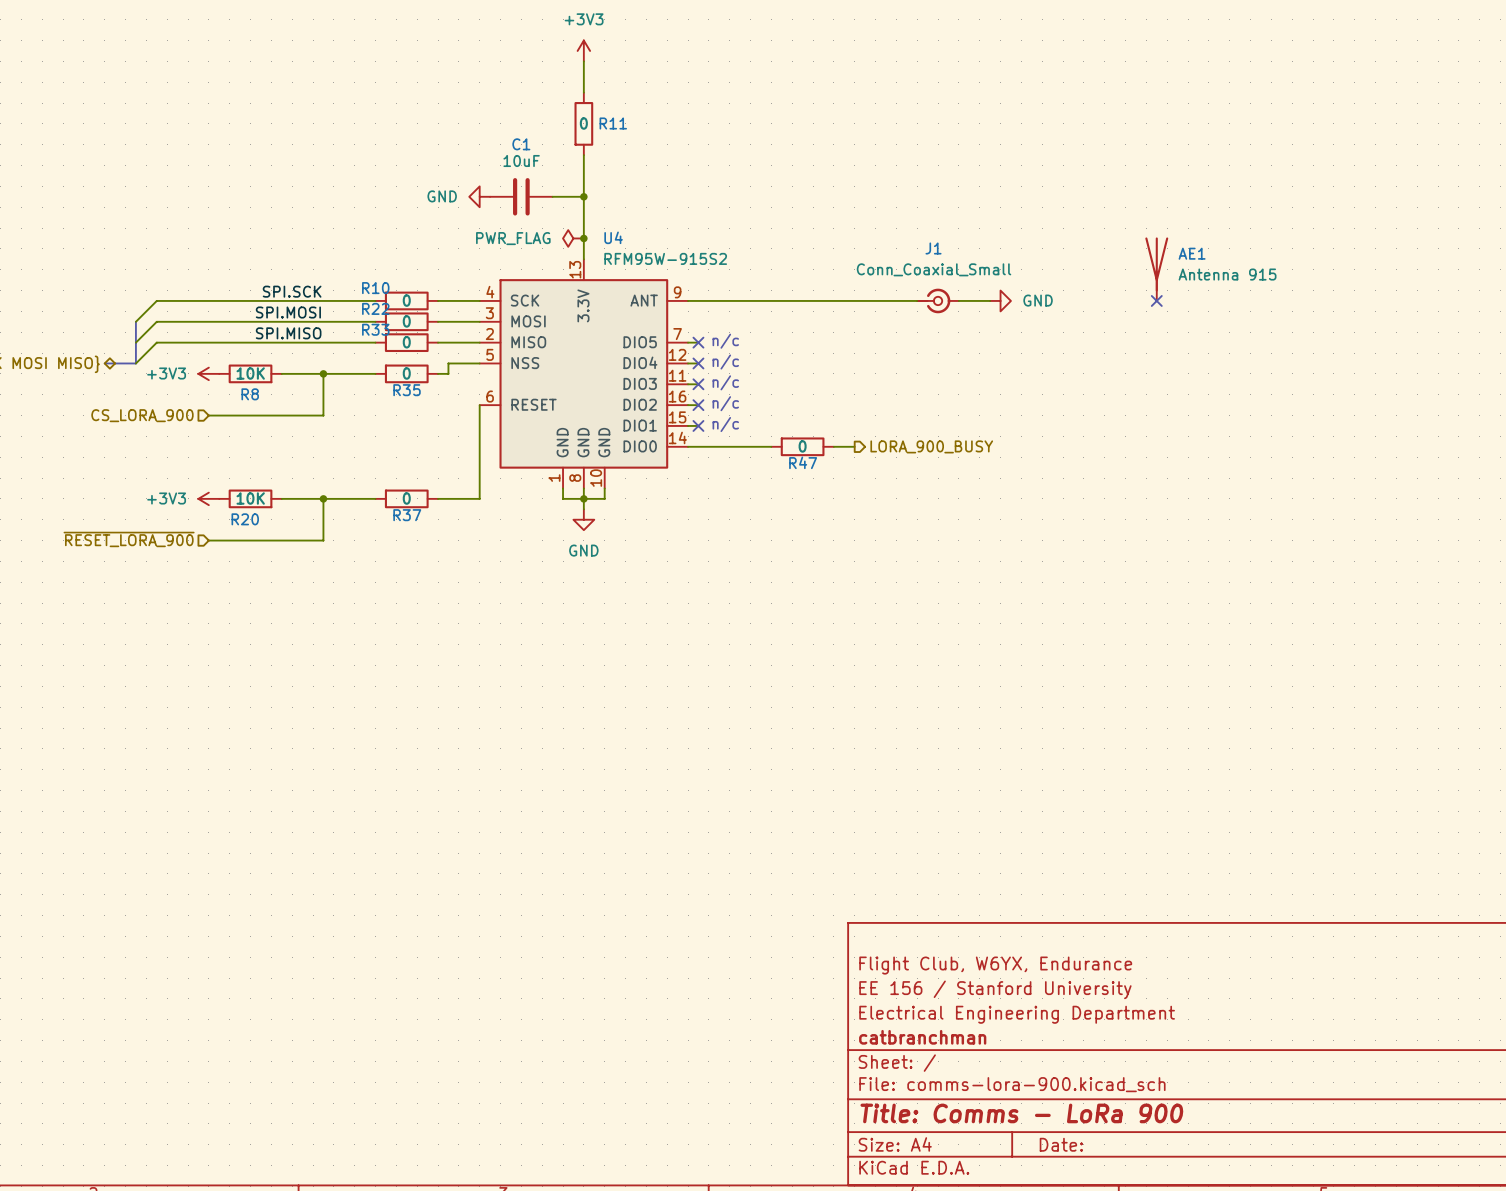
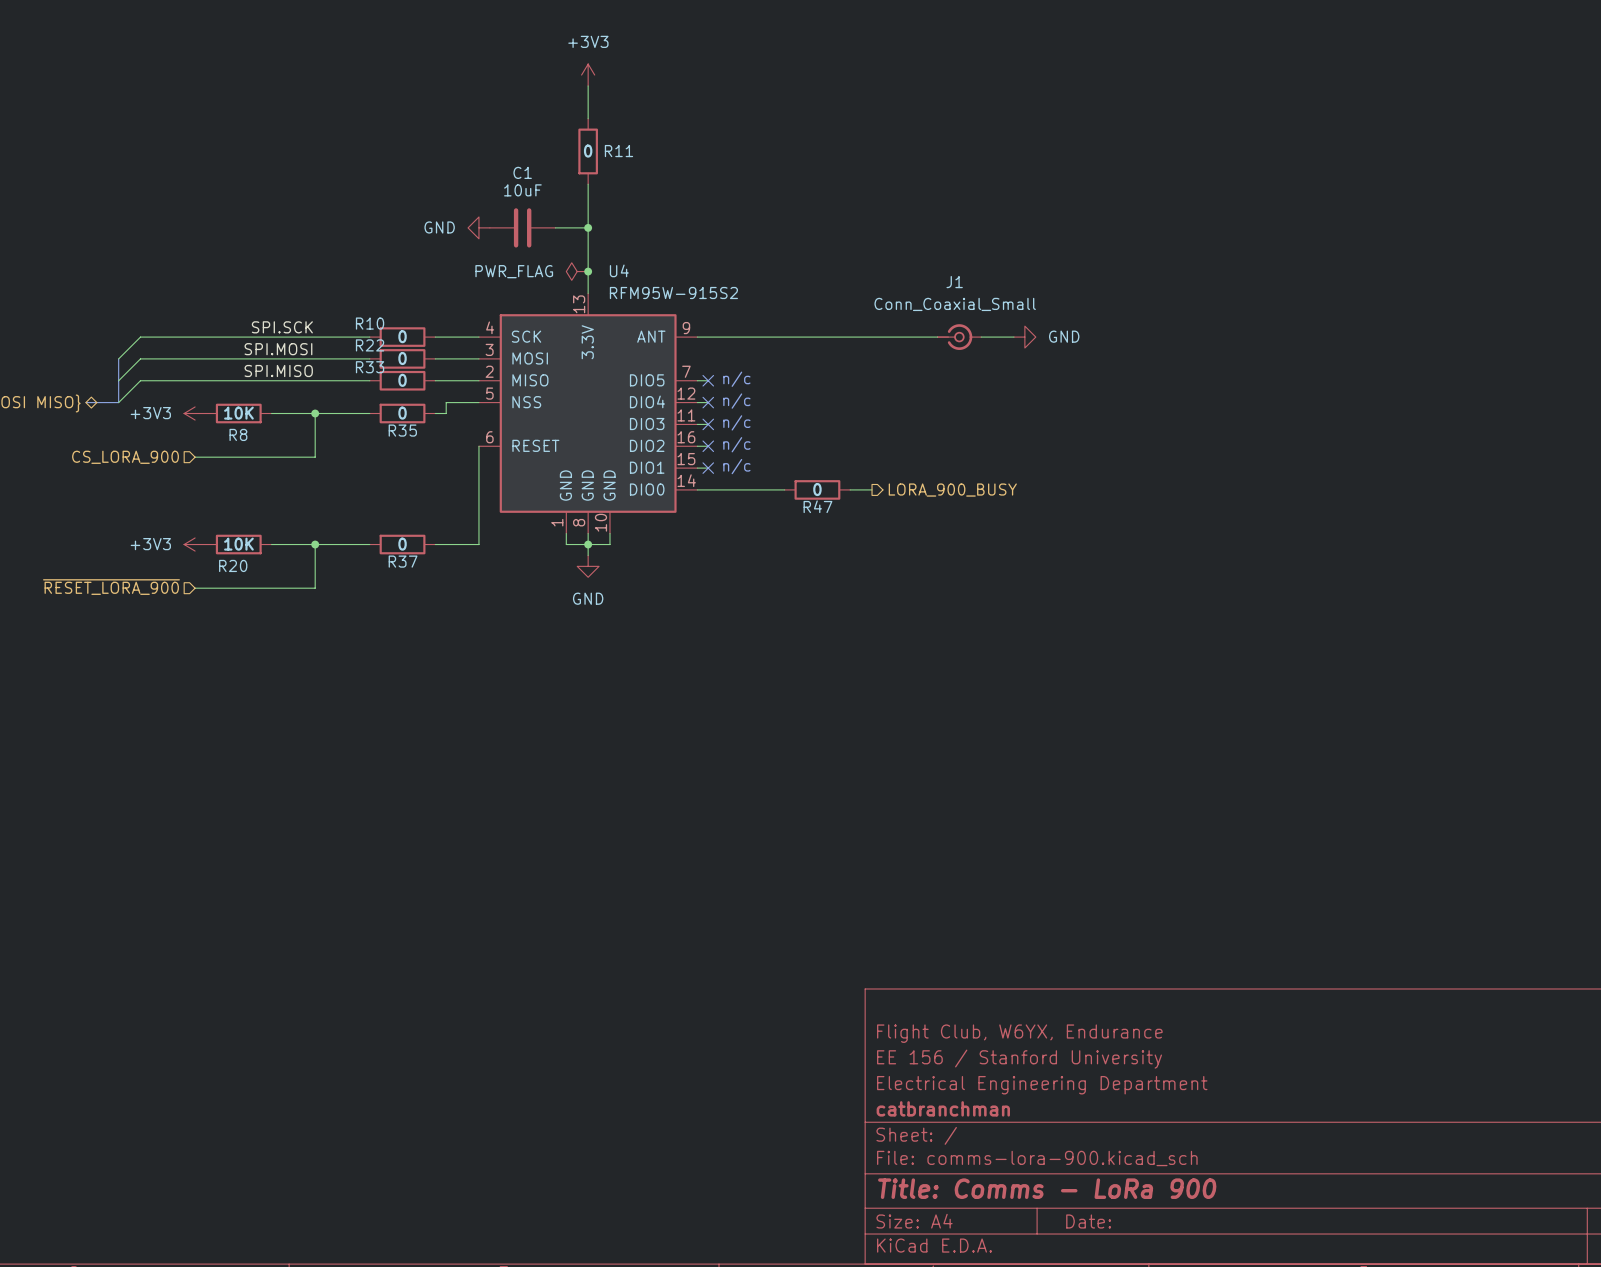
AE1: Antenna 915 (1156, 269) -> none
no-connect mark: (1156, 300) -> none

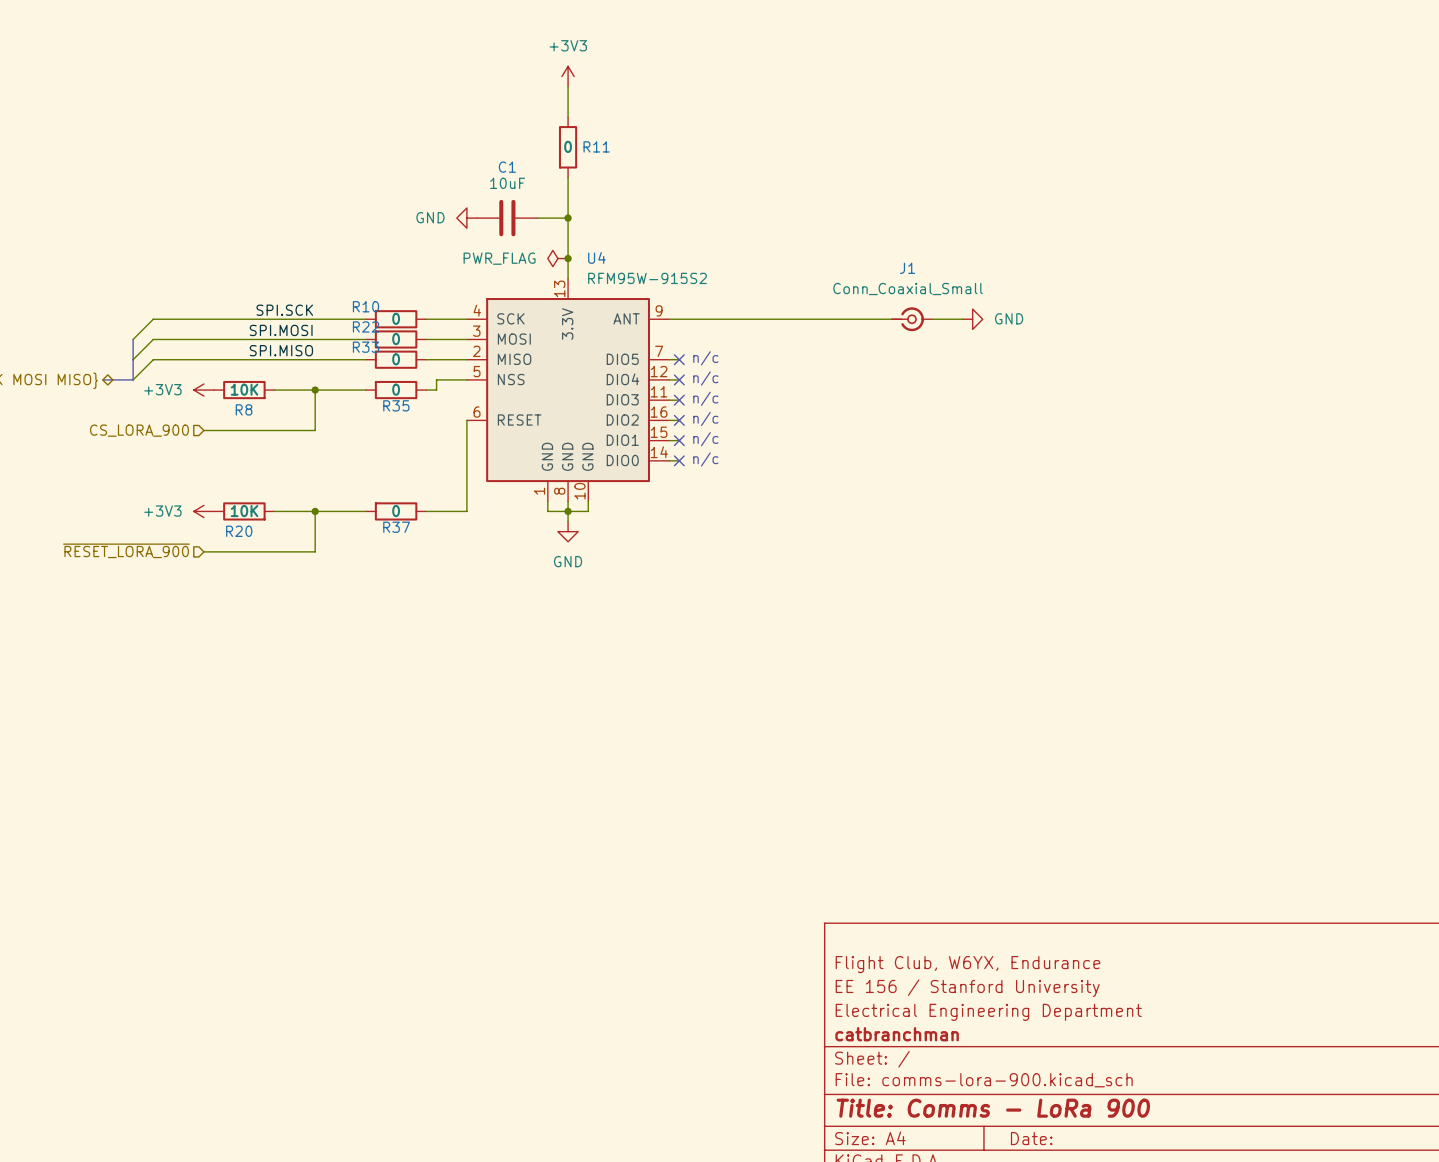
text: none -> n/c (705, 459)
wire: (708, 489) (784, 489) -> none
no-connect mark: none -> (679, 460)
R47: 0 (817, 489) -> none
wire: (850, 489) (872, 489) -> none
hierarchical label: LORA_900_BUSY (952, 490) -> none

